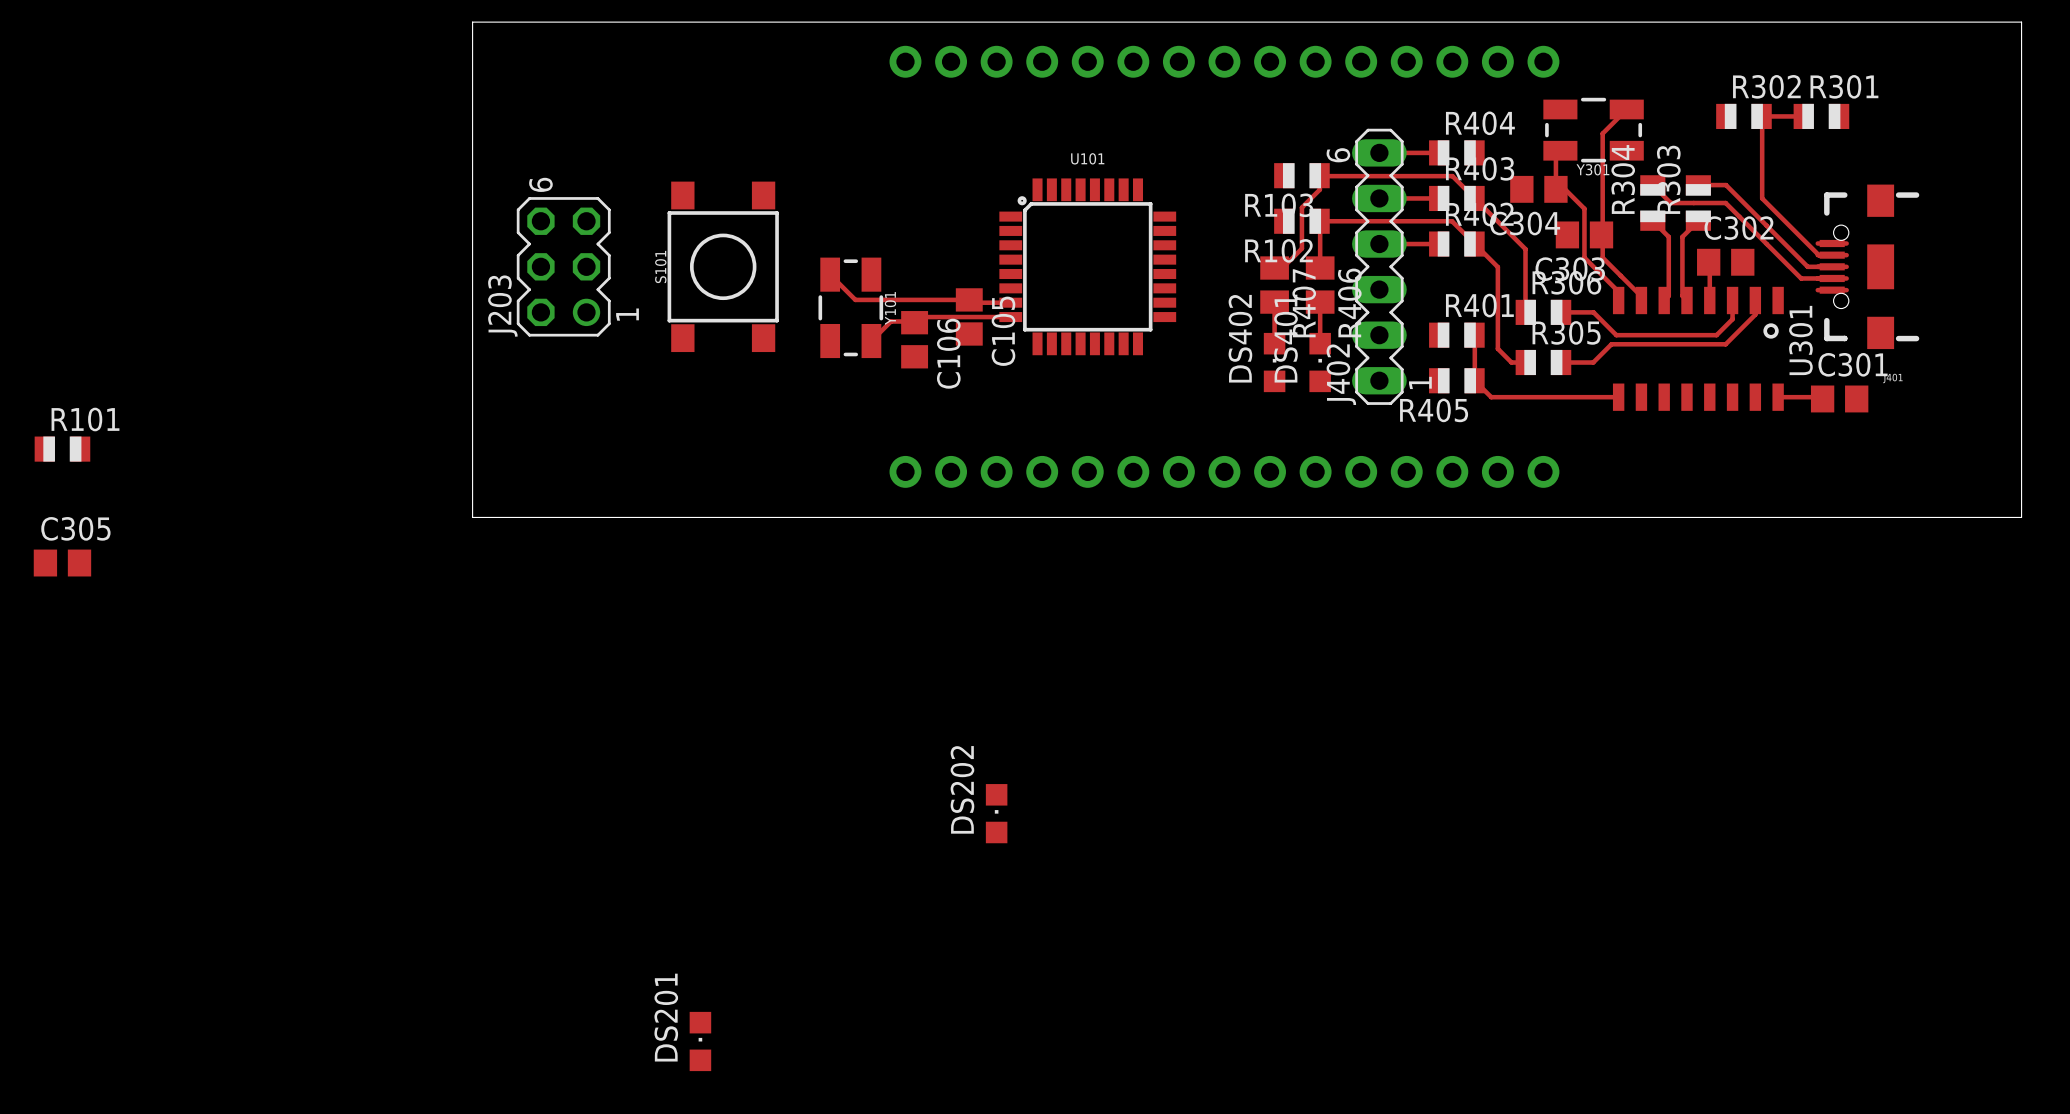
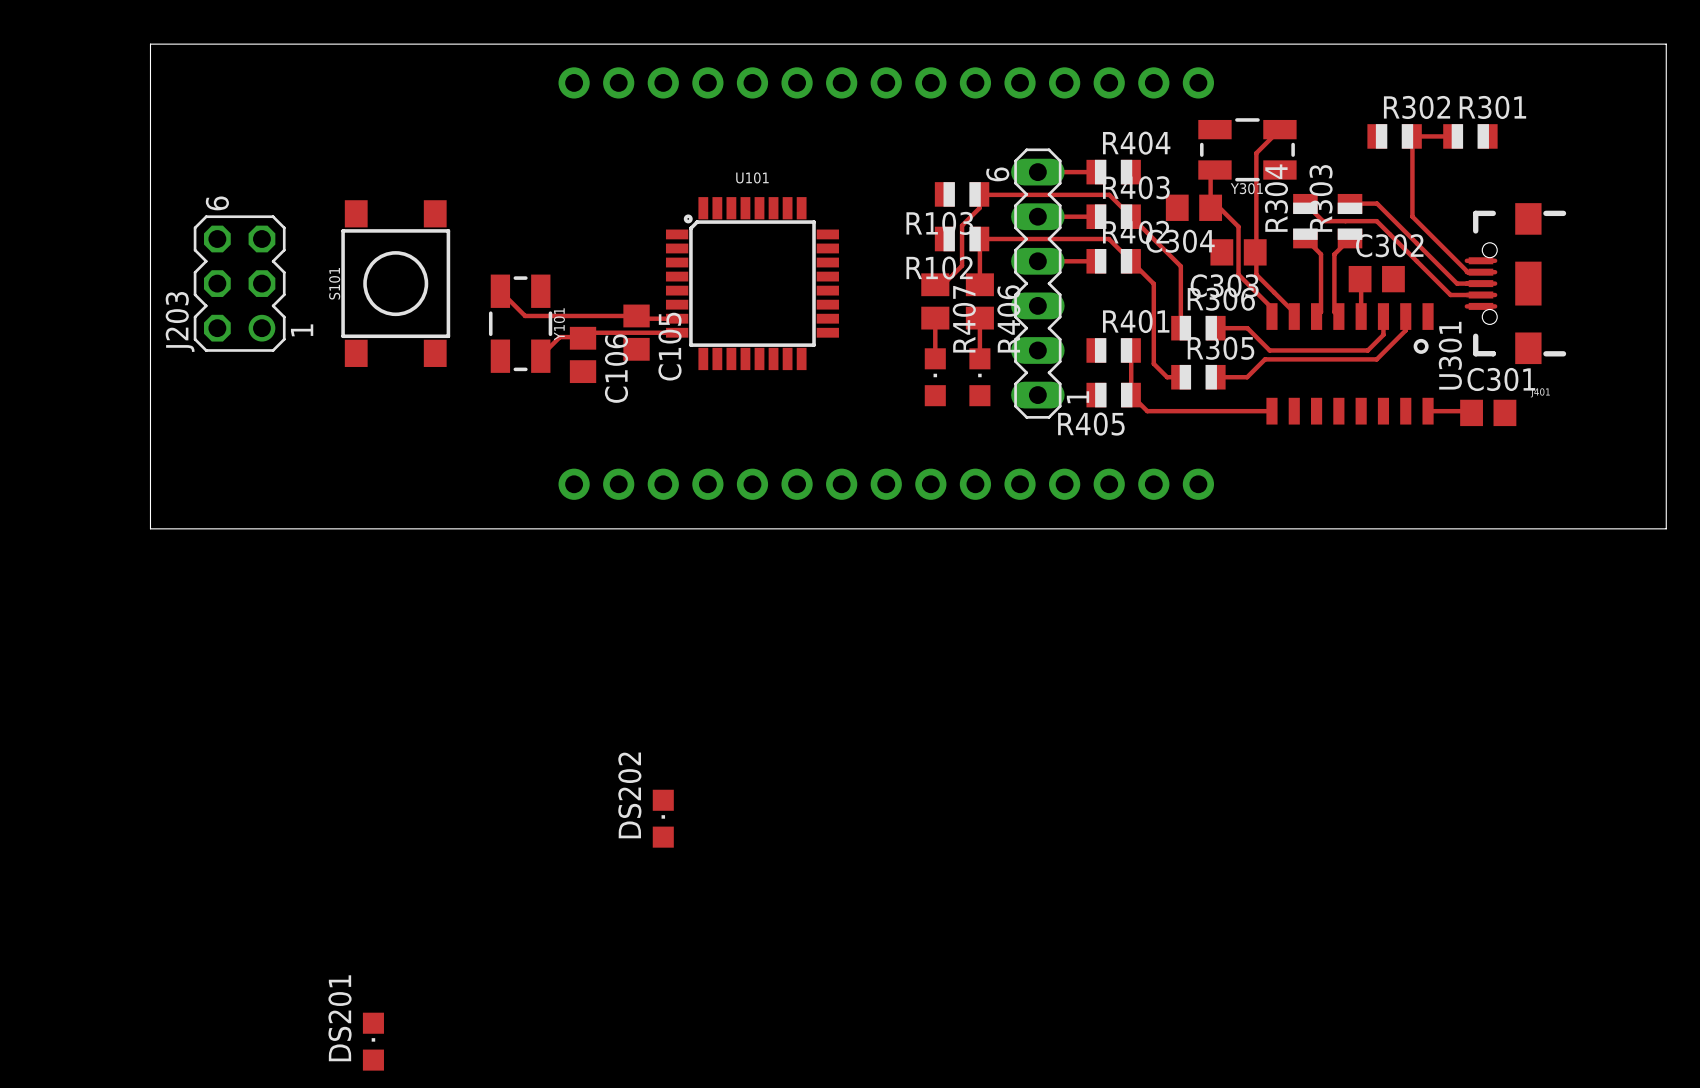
DS402 name: DS402 (1240, 338) -> none
DS401 name: DS401 (1286, 338) -> none
J402 name: J402 (1341, 374) -> none

